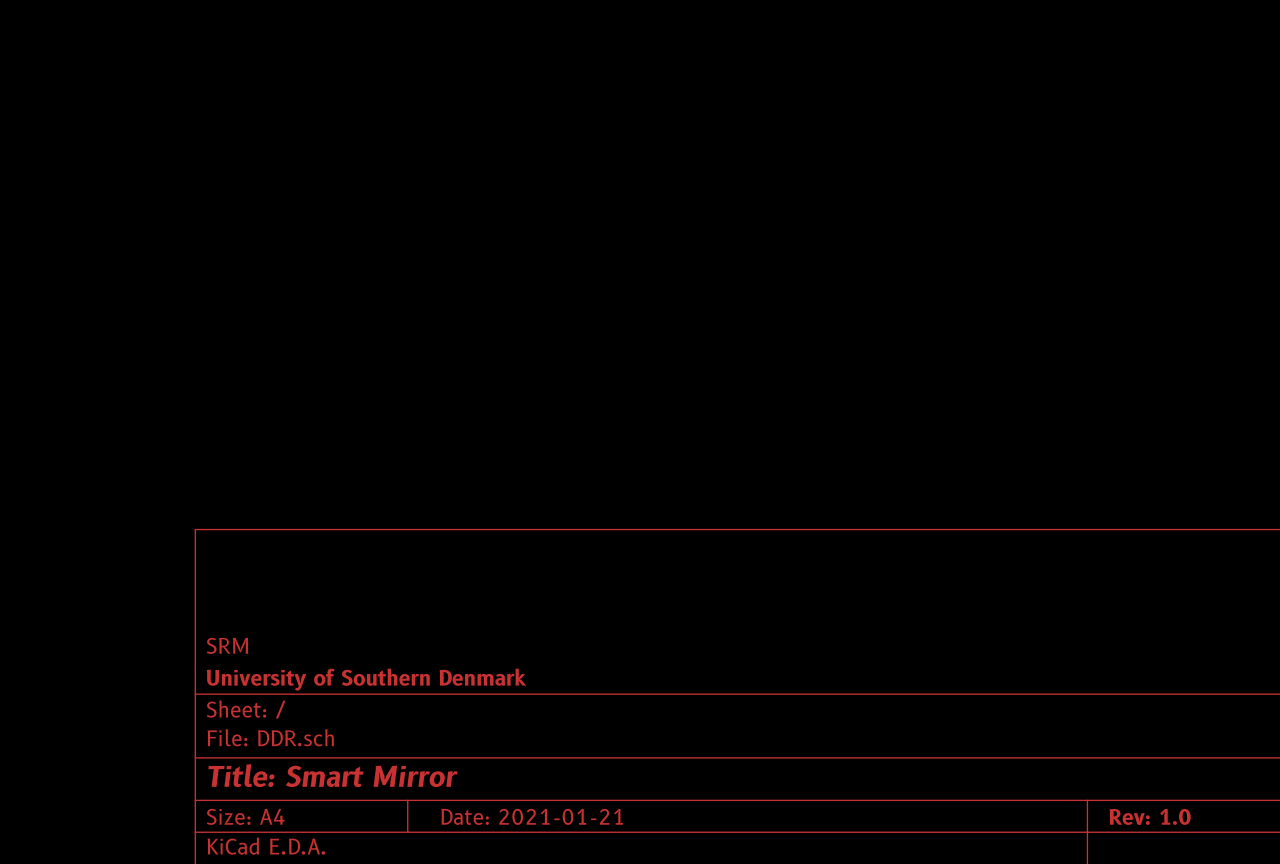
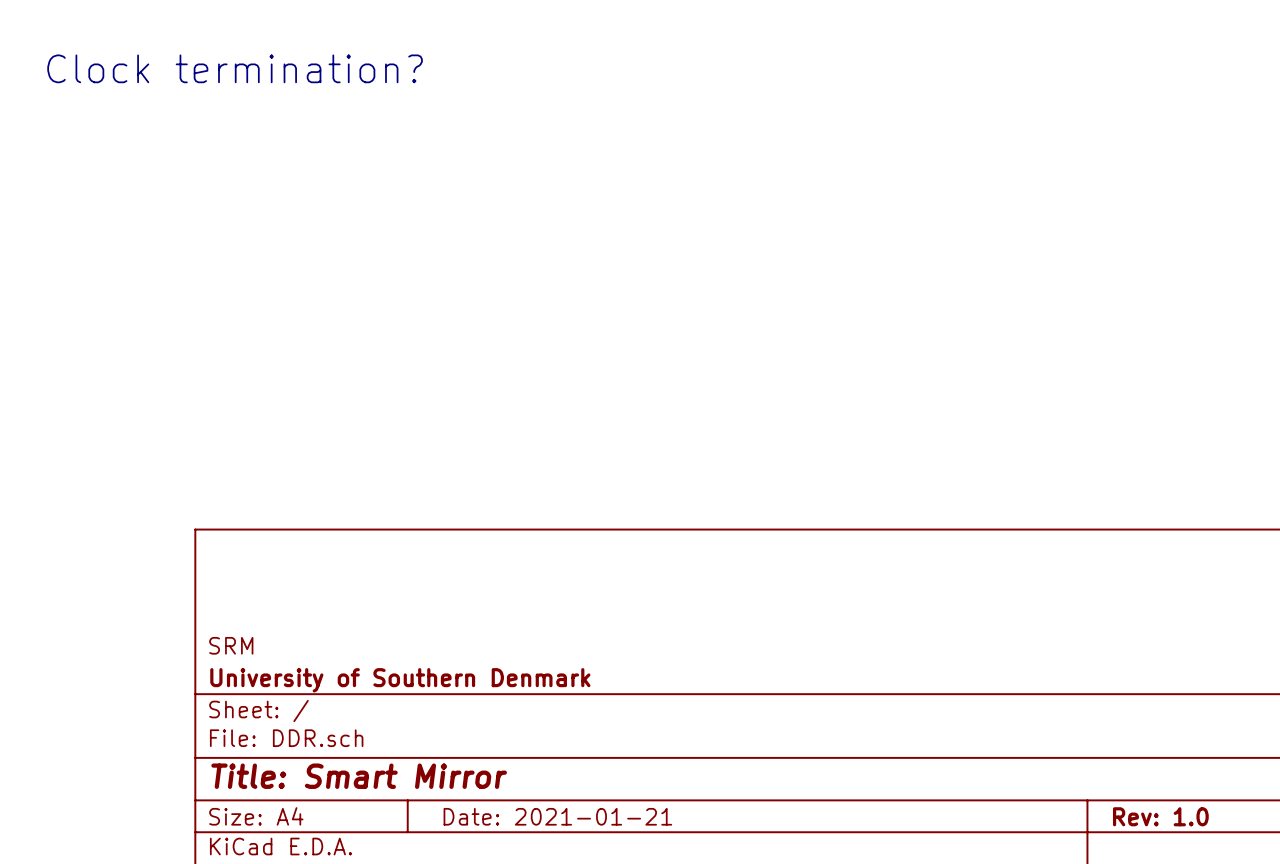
text: none -> Clock termination? (235, 68)

